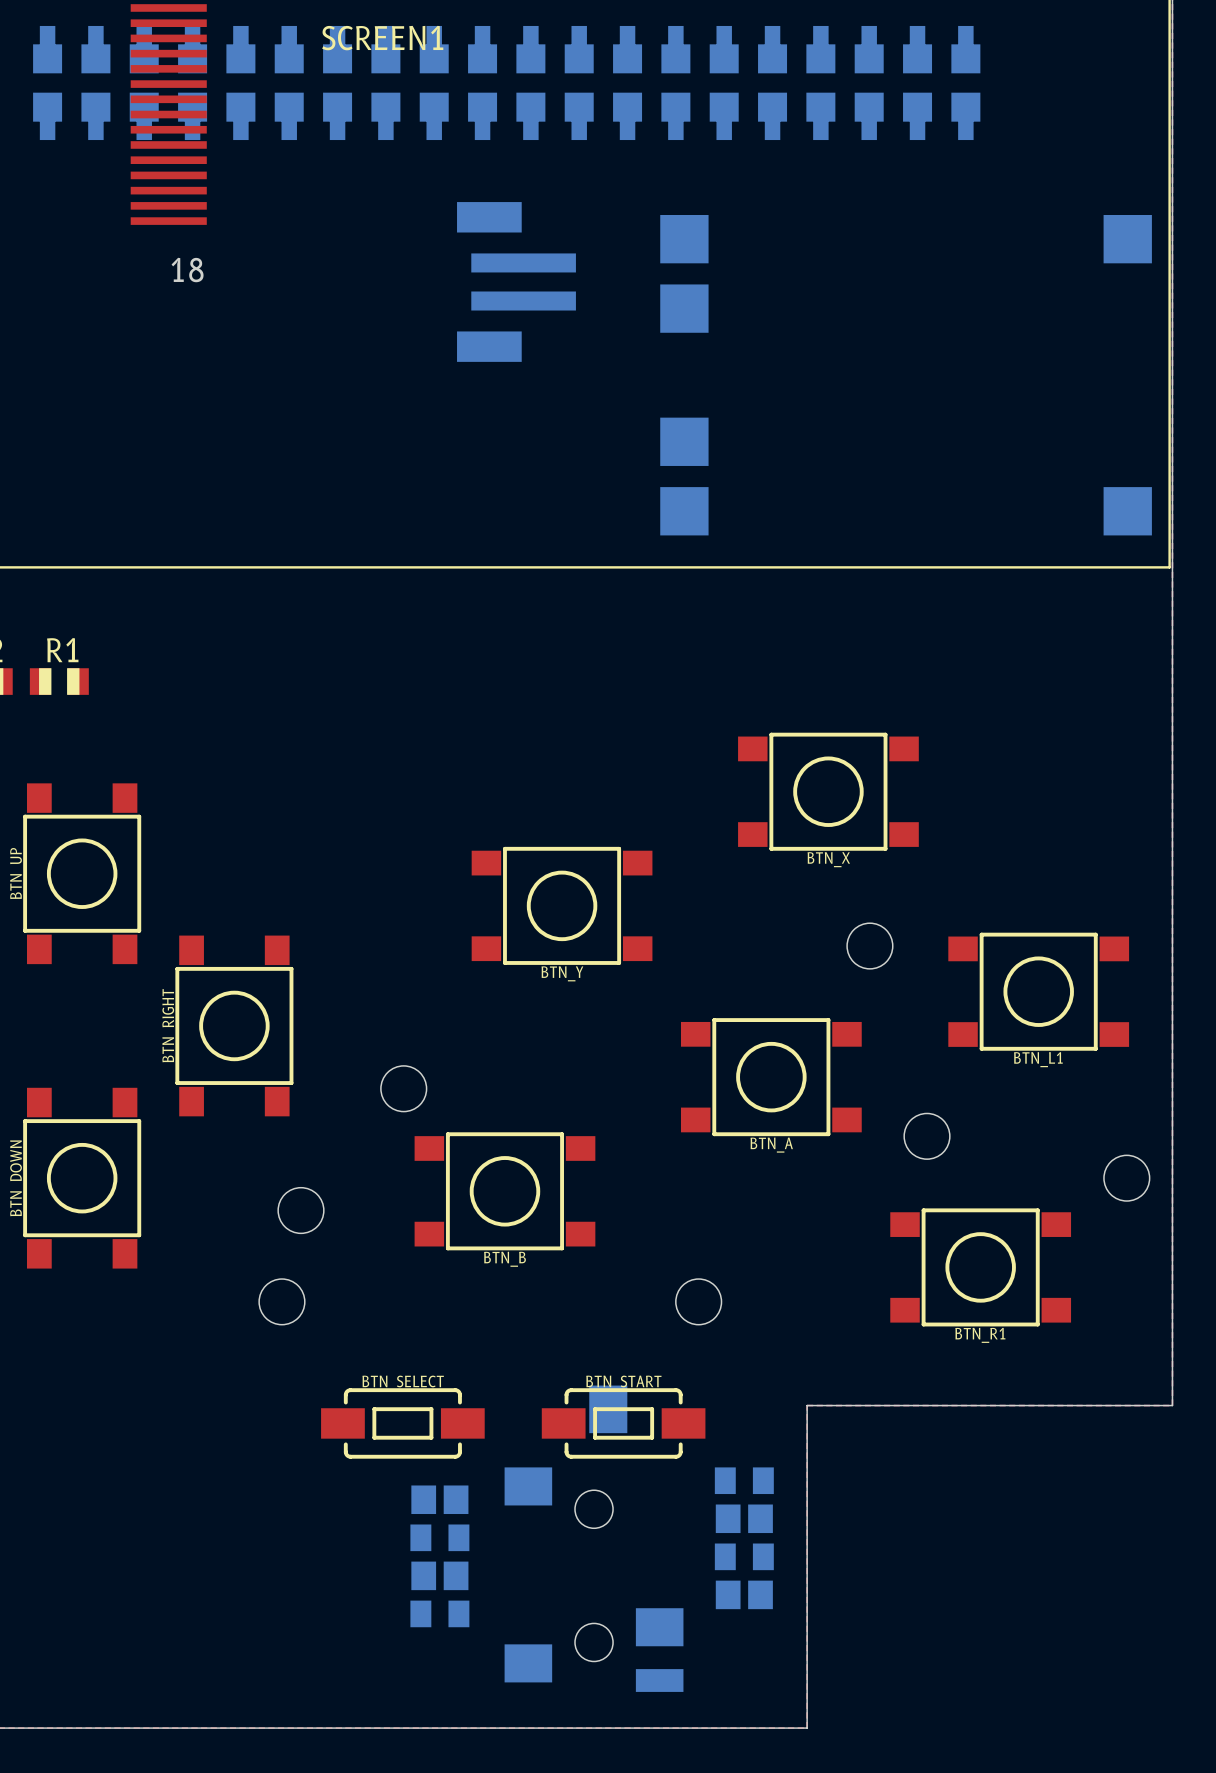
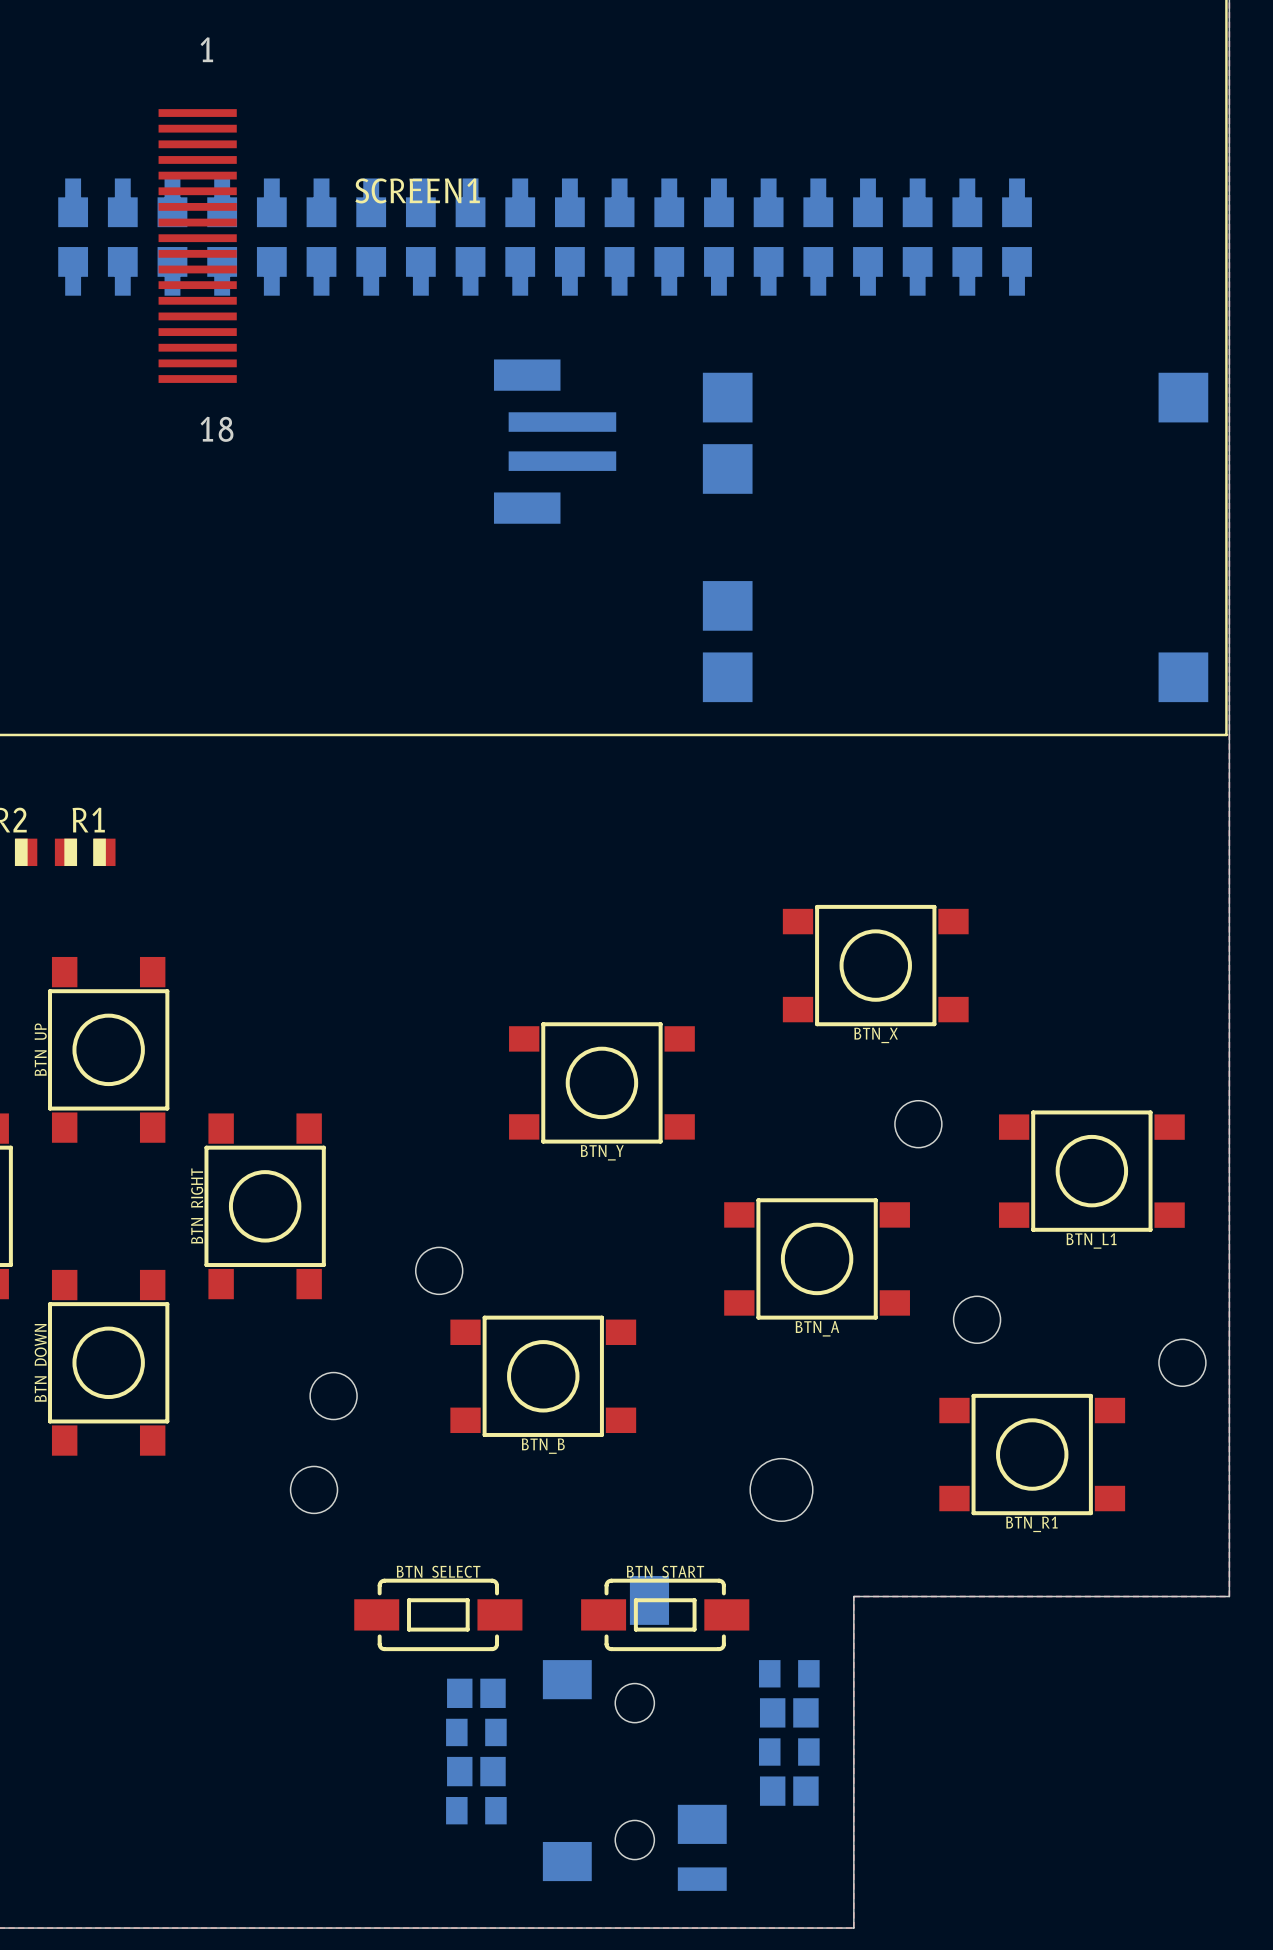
round board edge: none -> [750, 1458, 813, 1522]
round board edge: [675, 1278, 722, 1325] -> none

